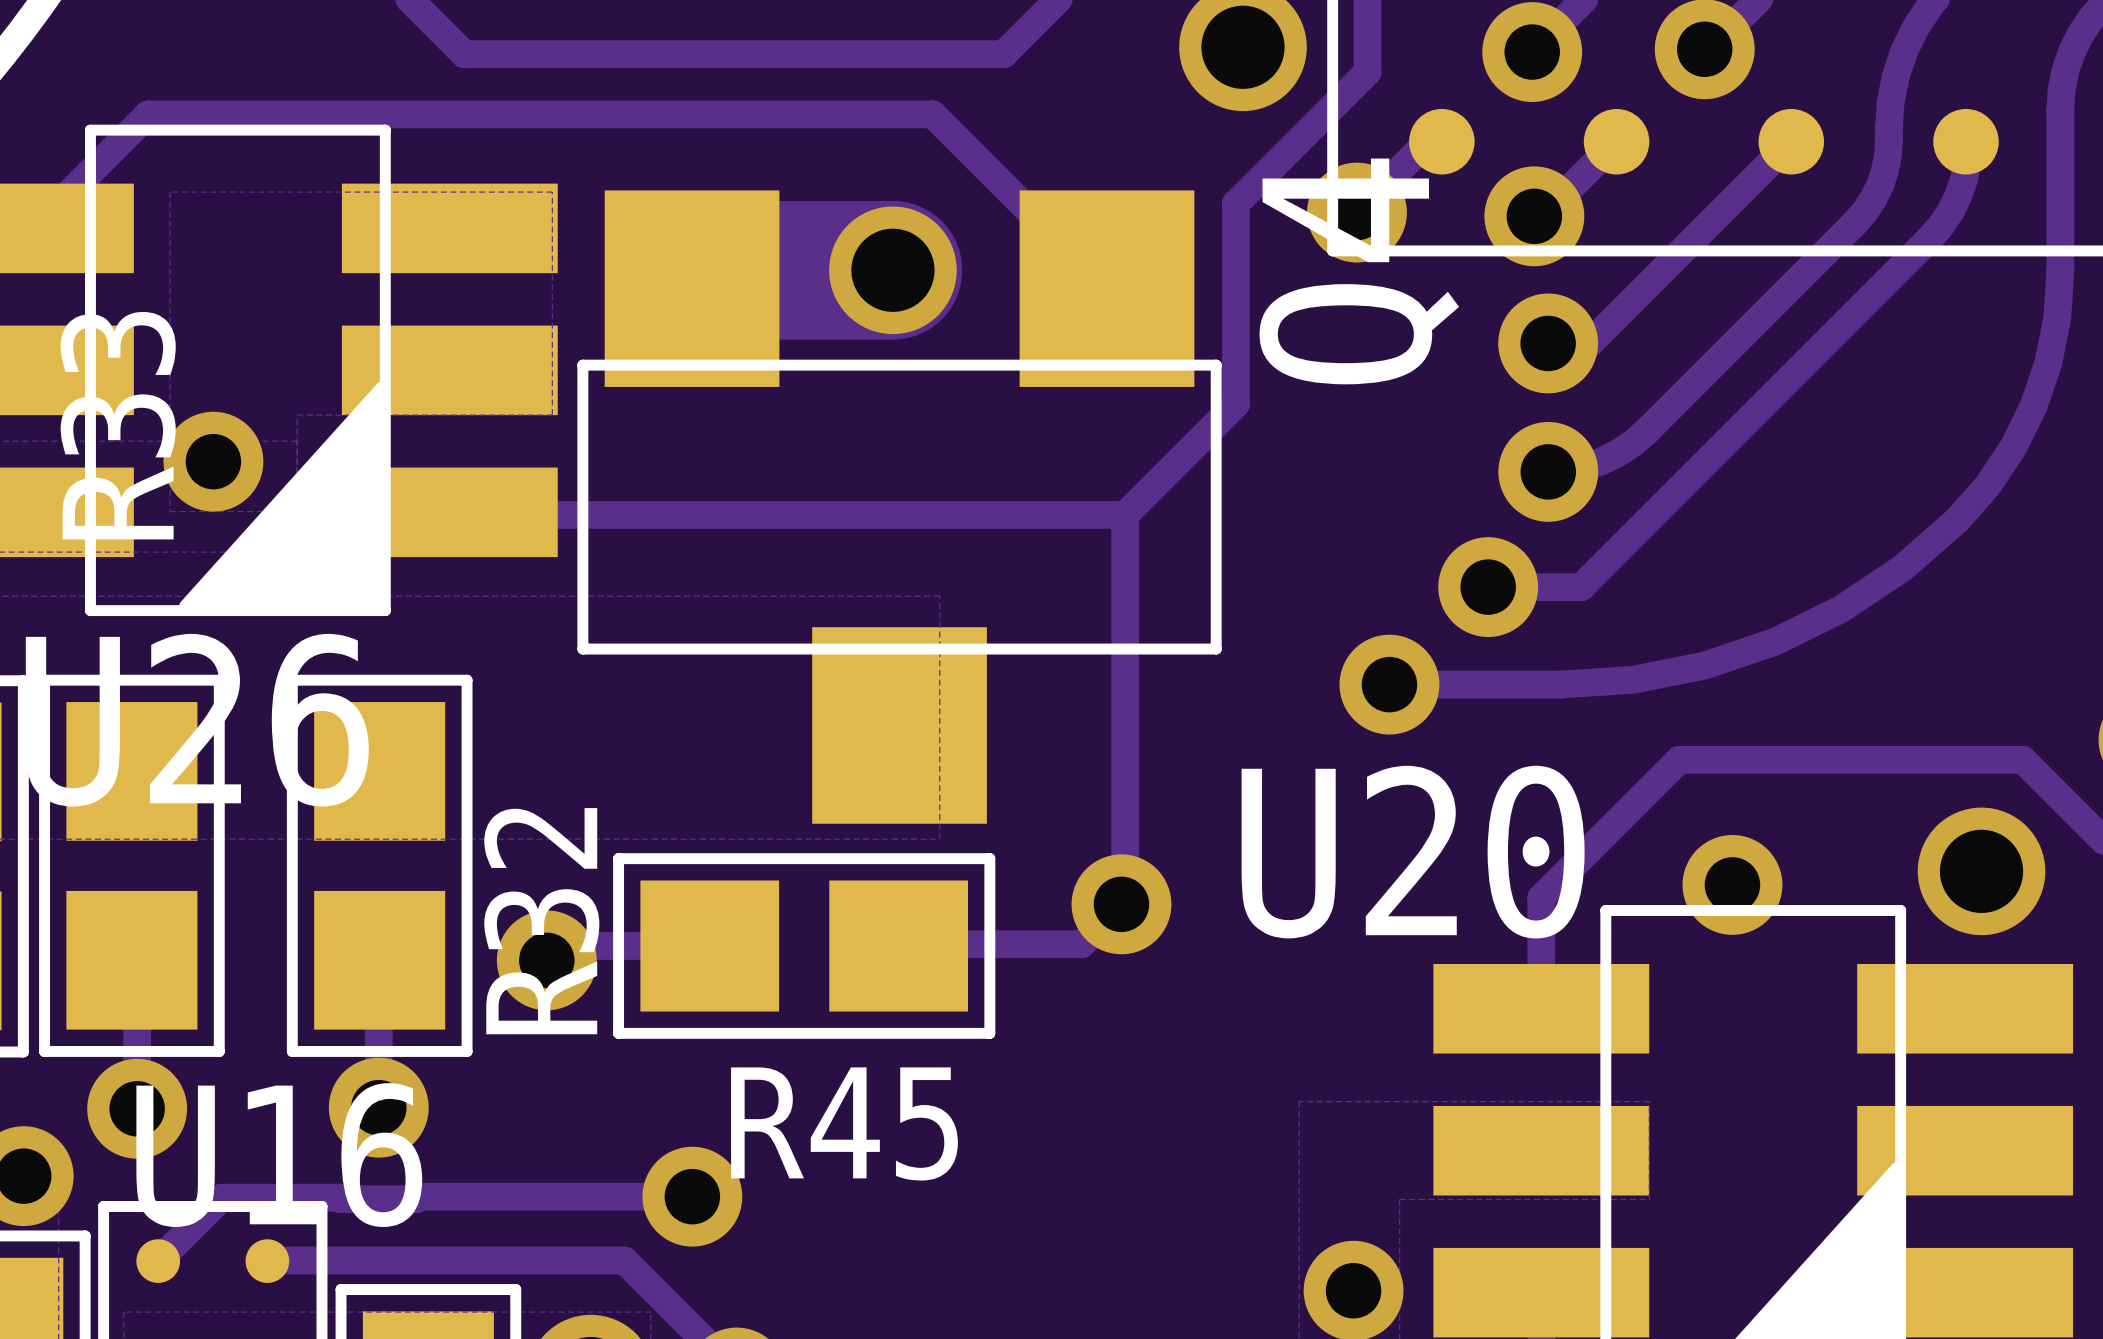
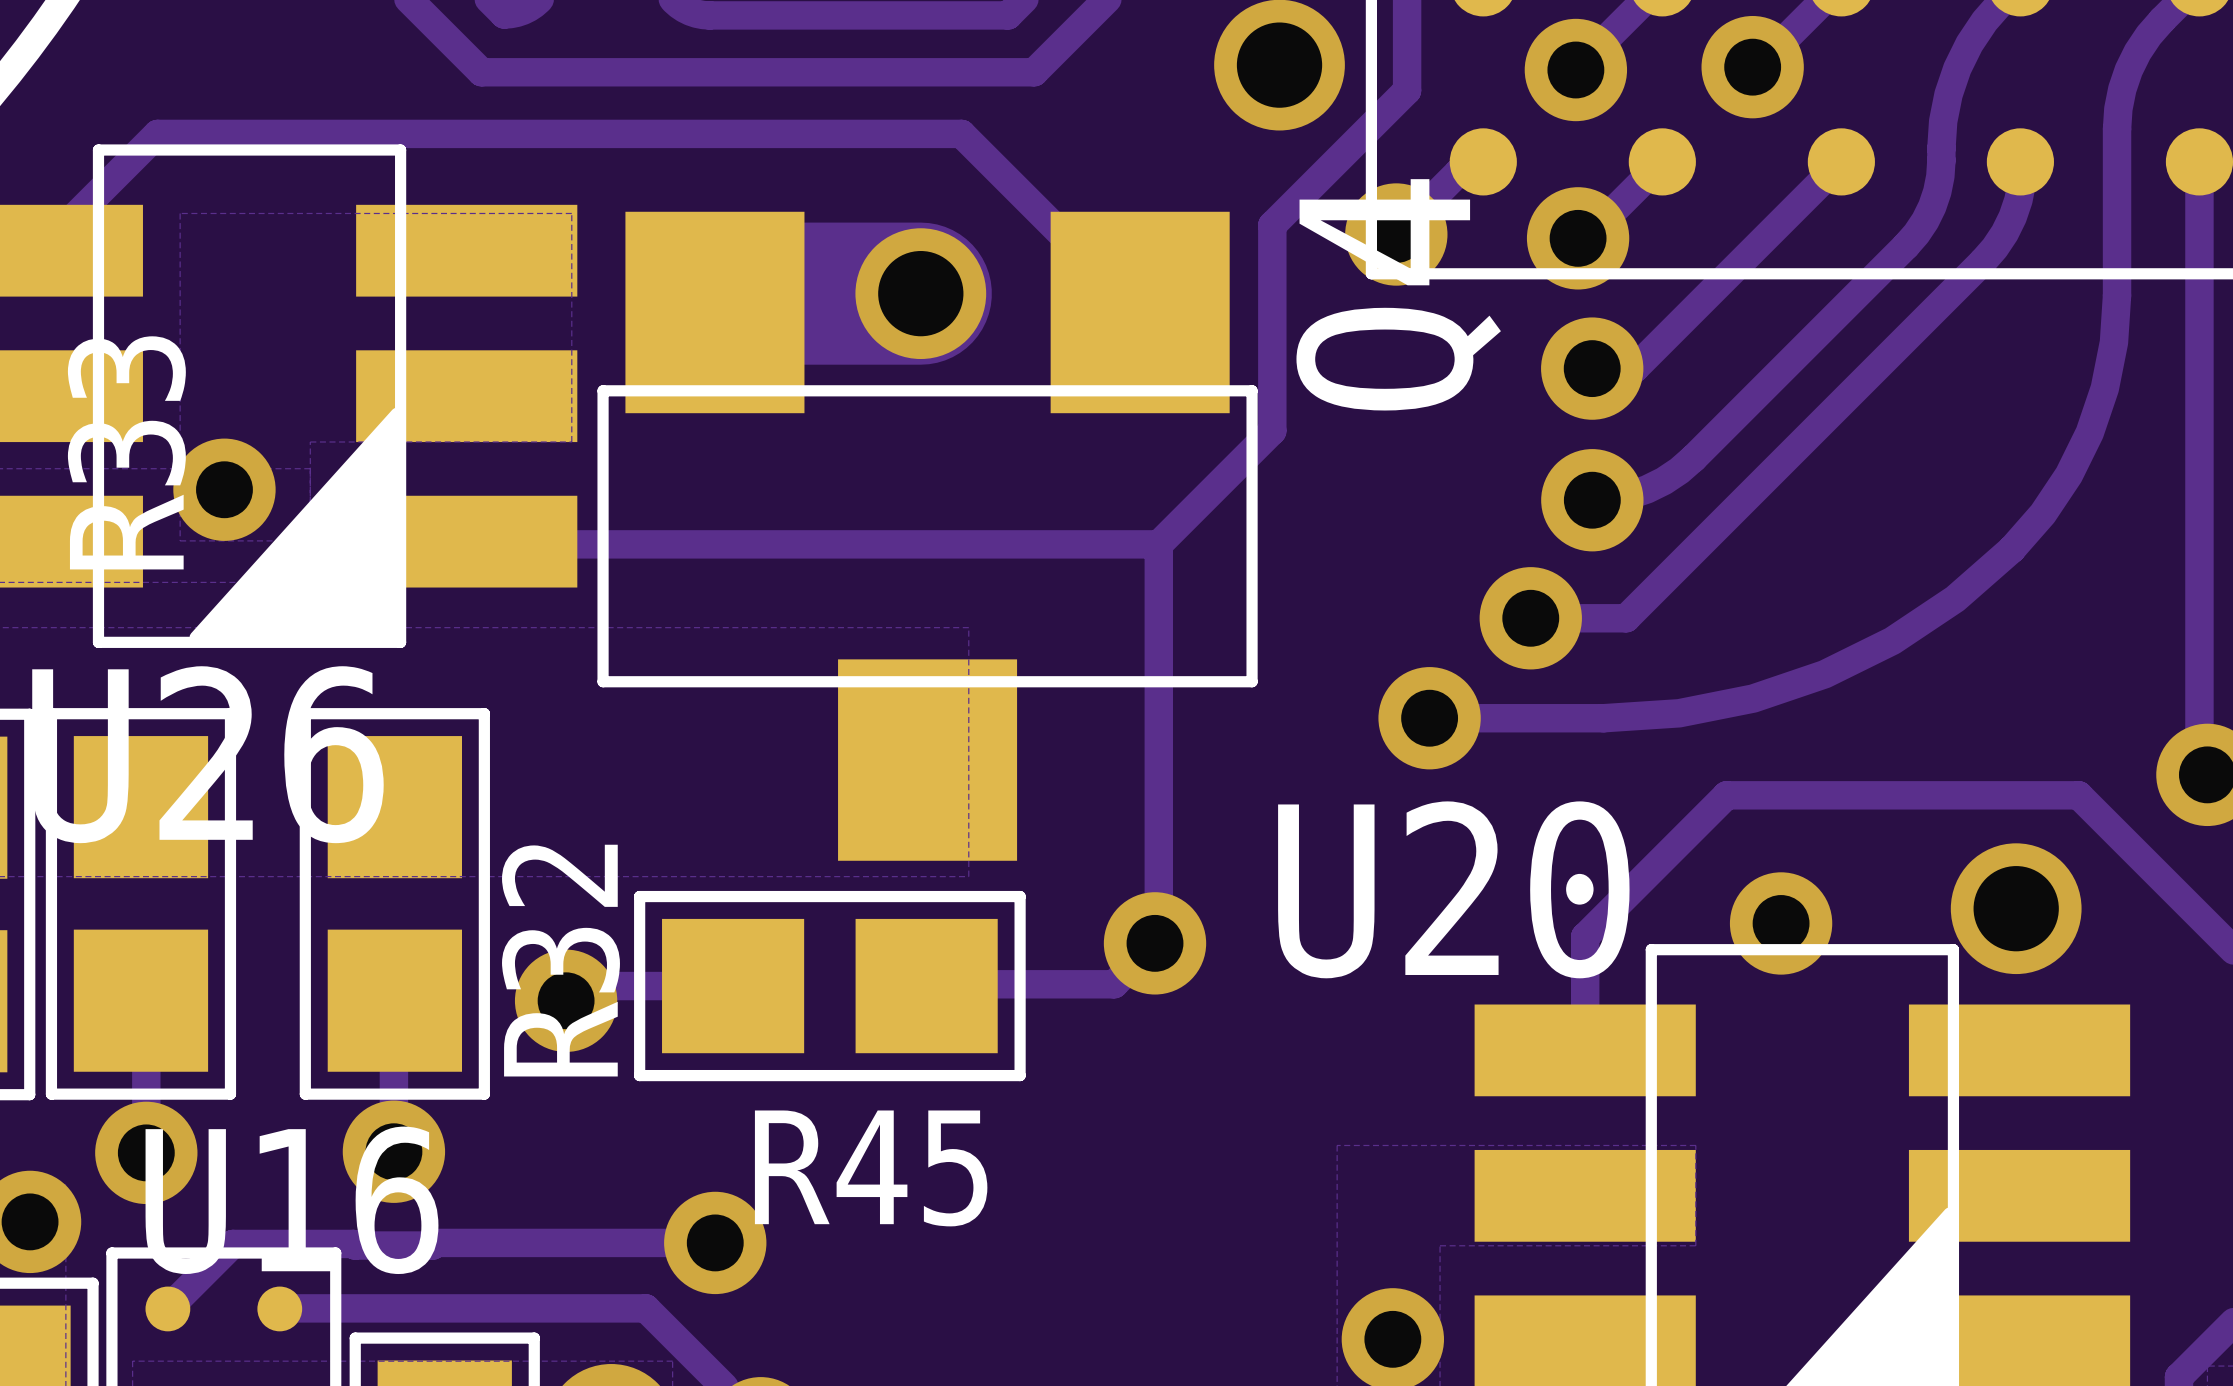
via position: (1981, 871) -> (2016, 908)

